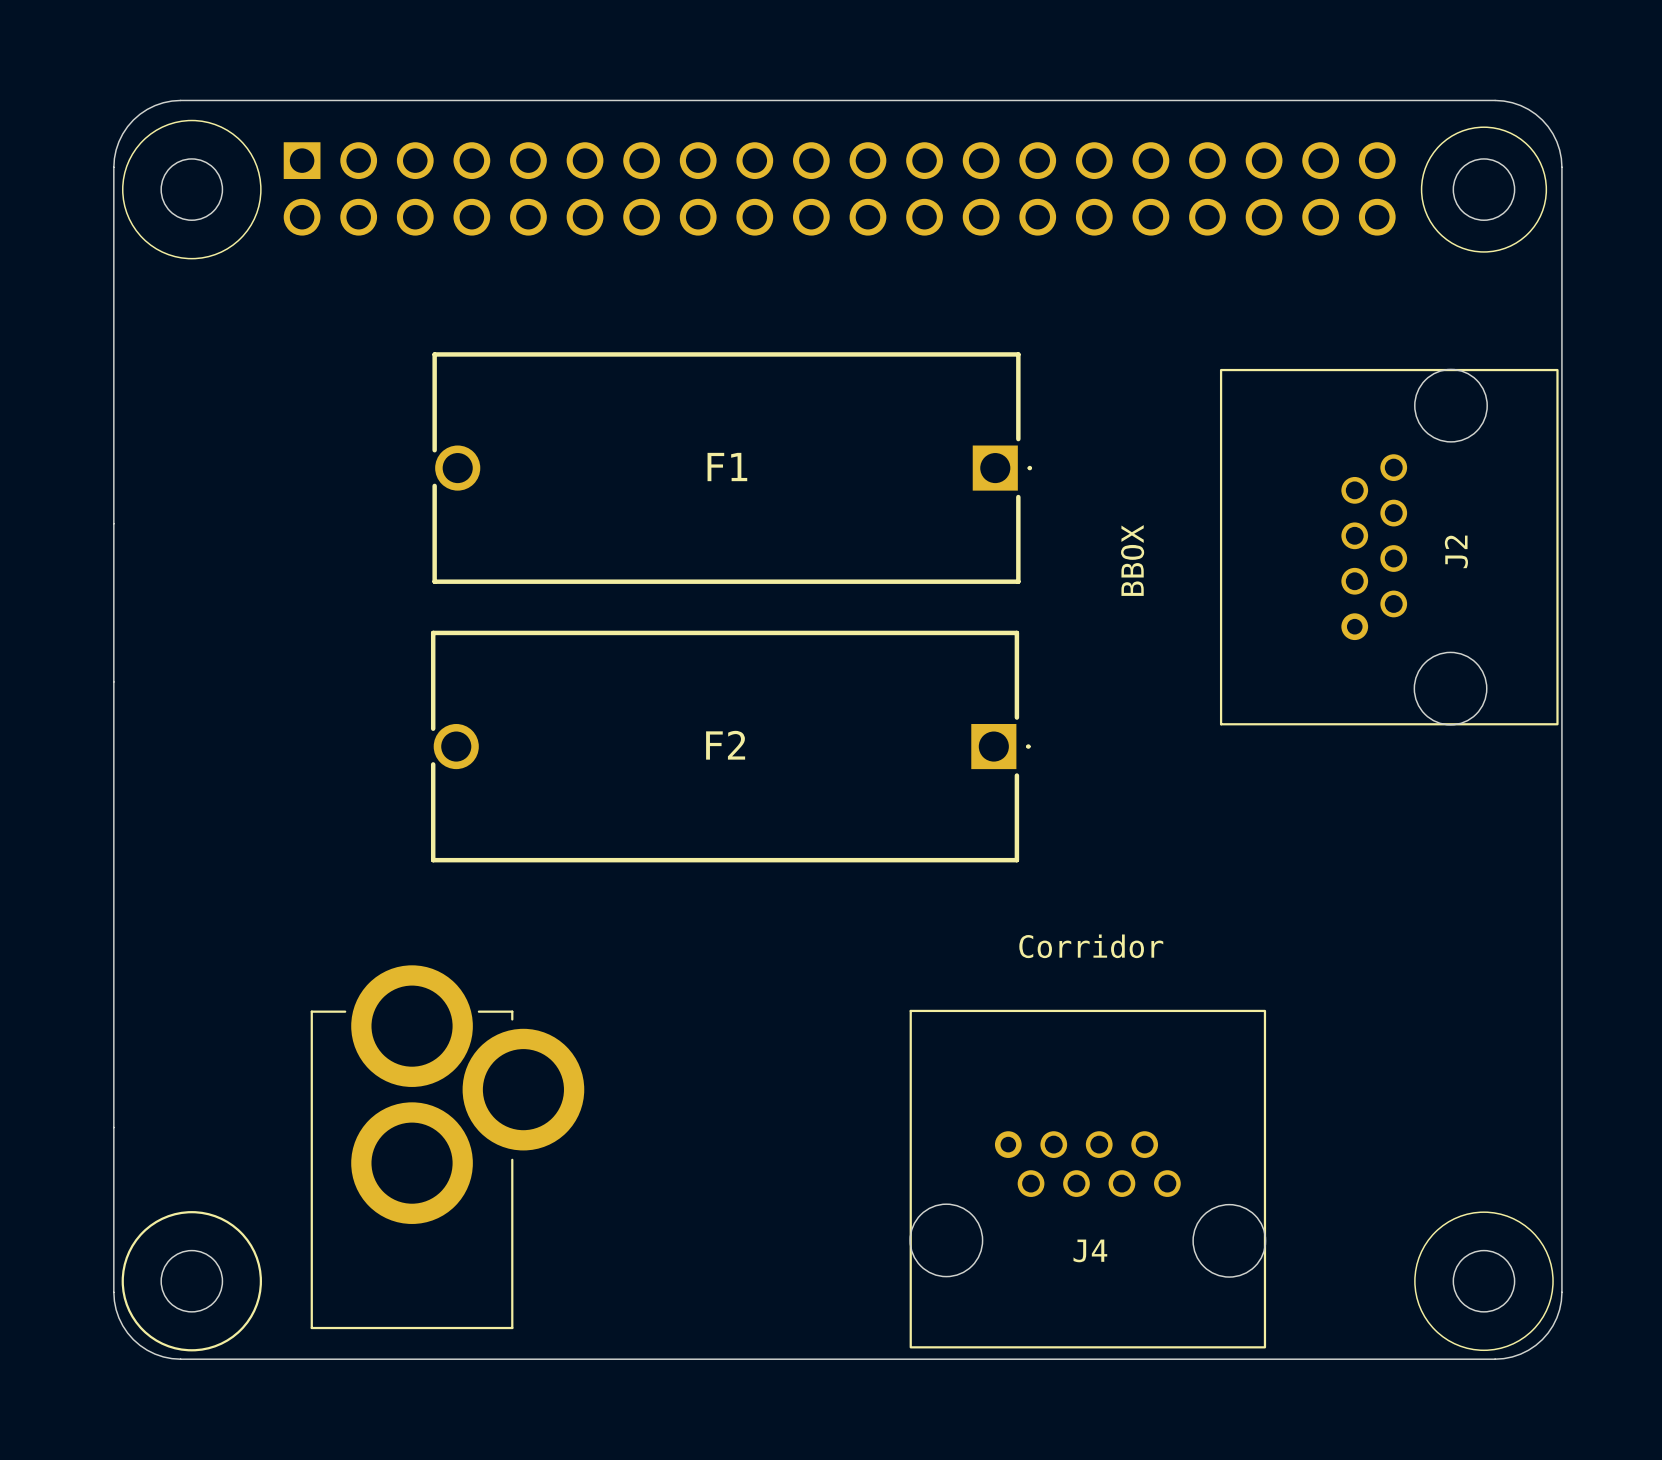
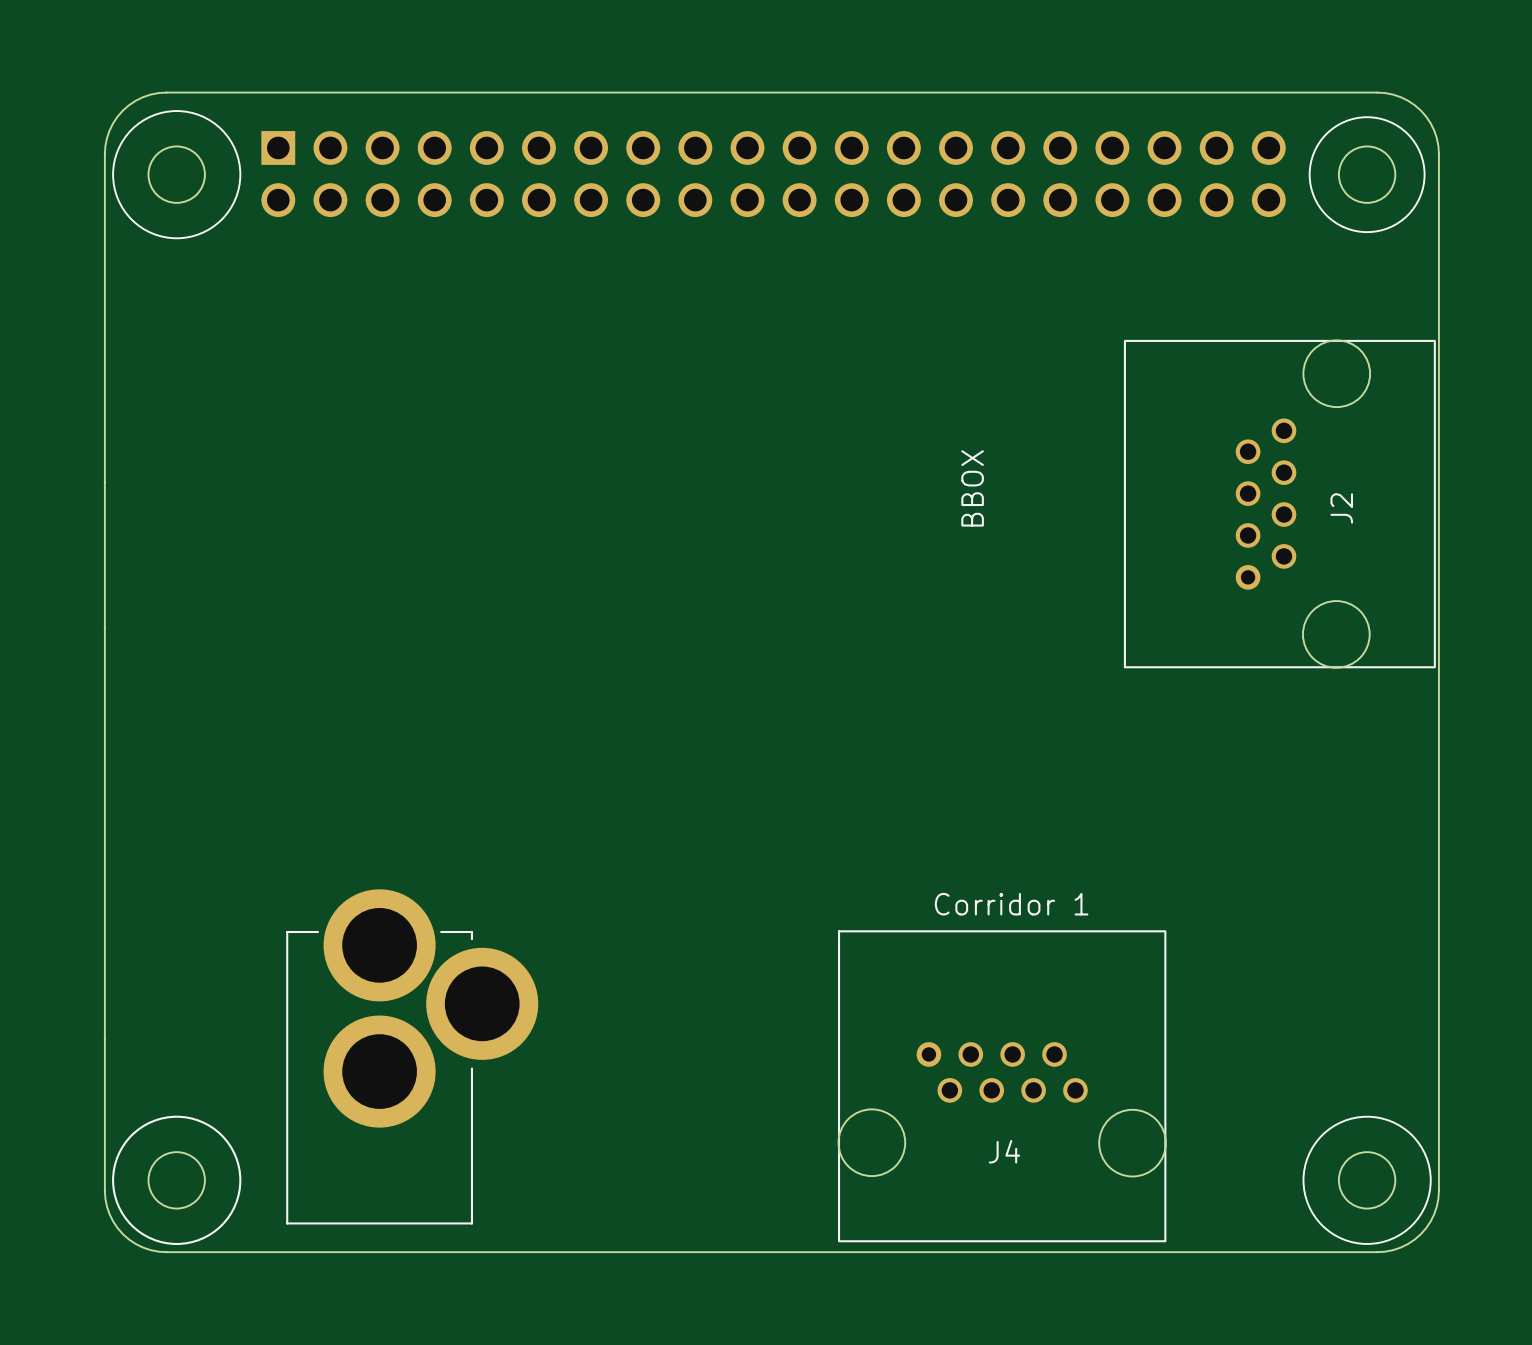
F1: (732, 468) -> none
text position: BBOX (1132, 560) -> BBOX (972, 488)
F2: (730, 746) -> none
text: Corridor (1091, 946) -> Corridor 1 (1011, 904)

